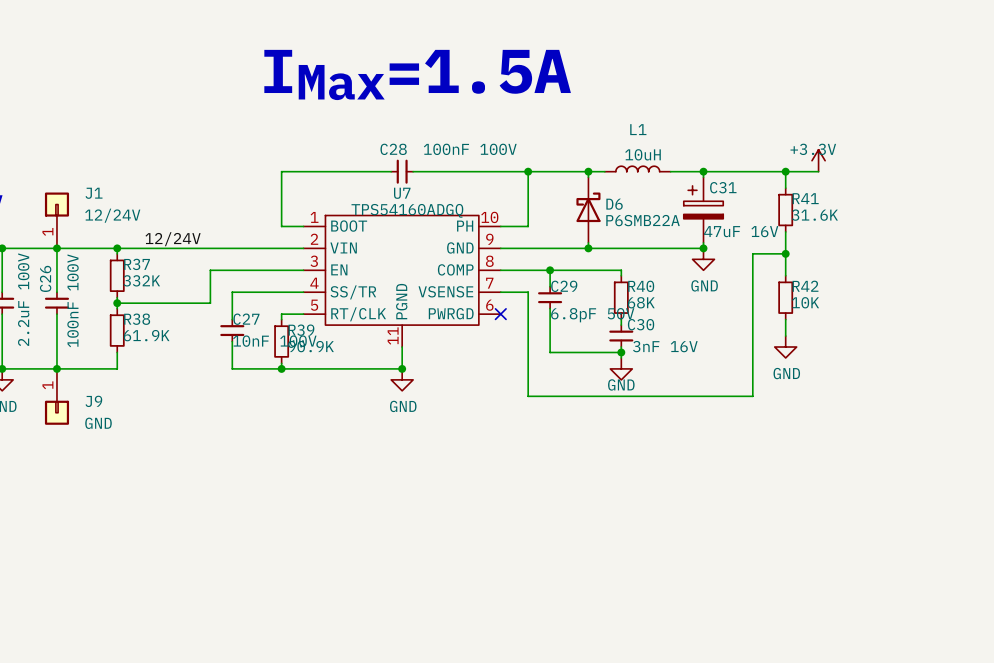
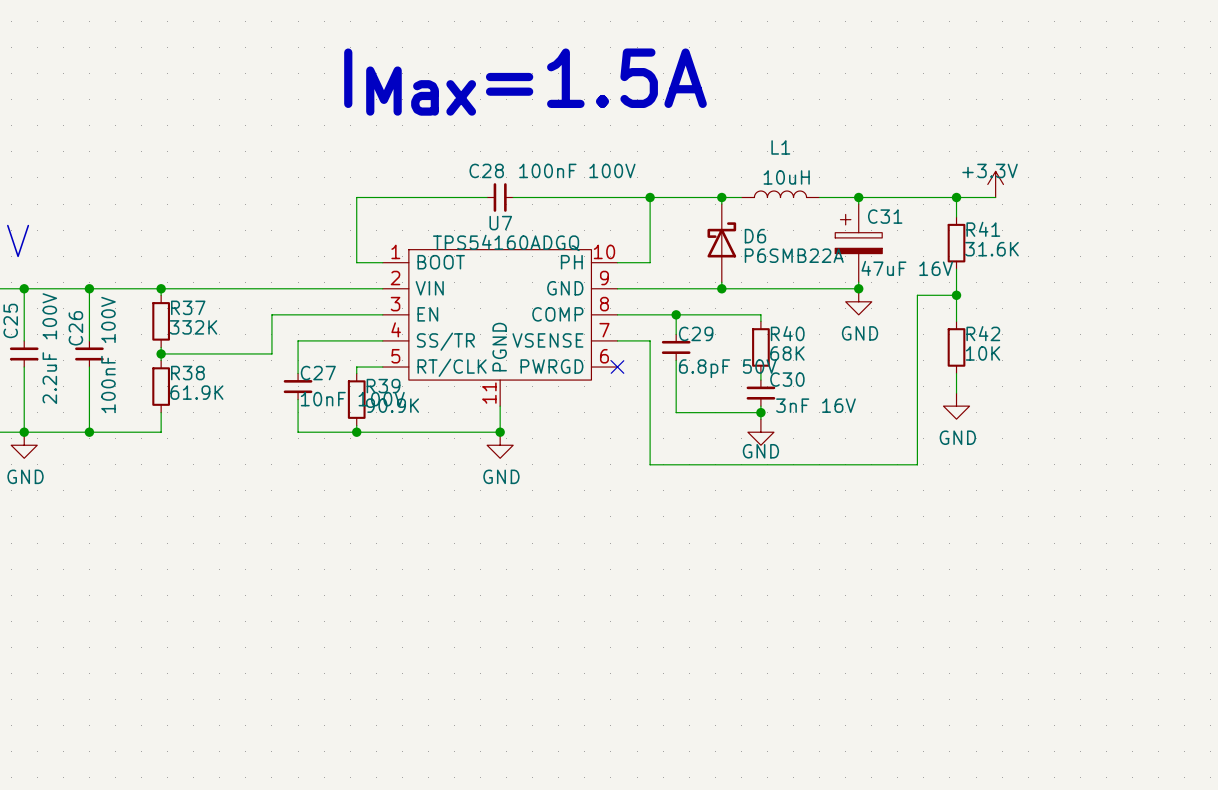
J1: 12/24V (56, 220) -> none
label: 12/24V (173, 239) -> none
J9: GND (56, 396) -> none

